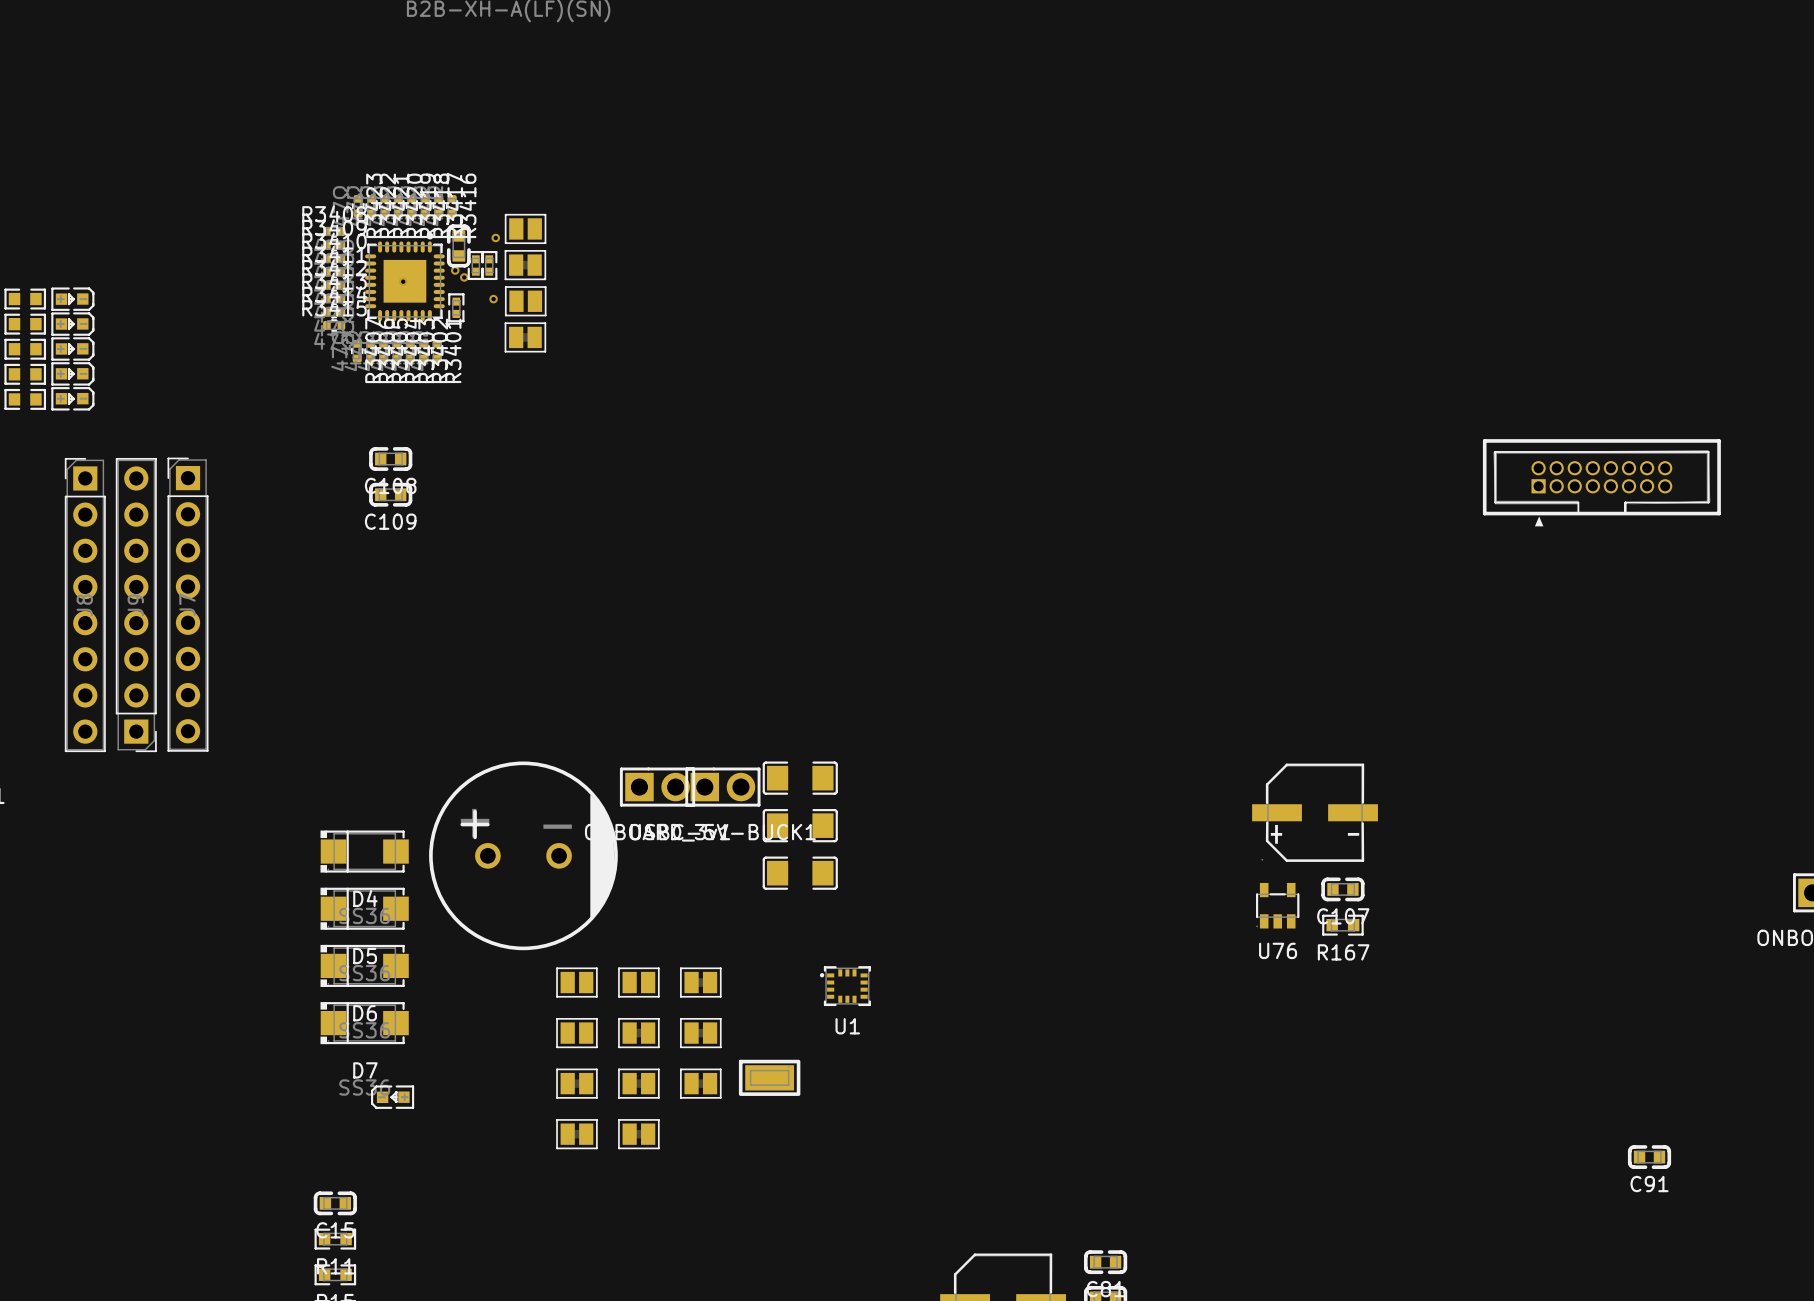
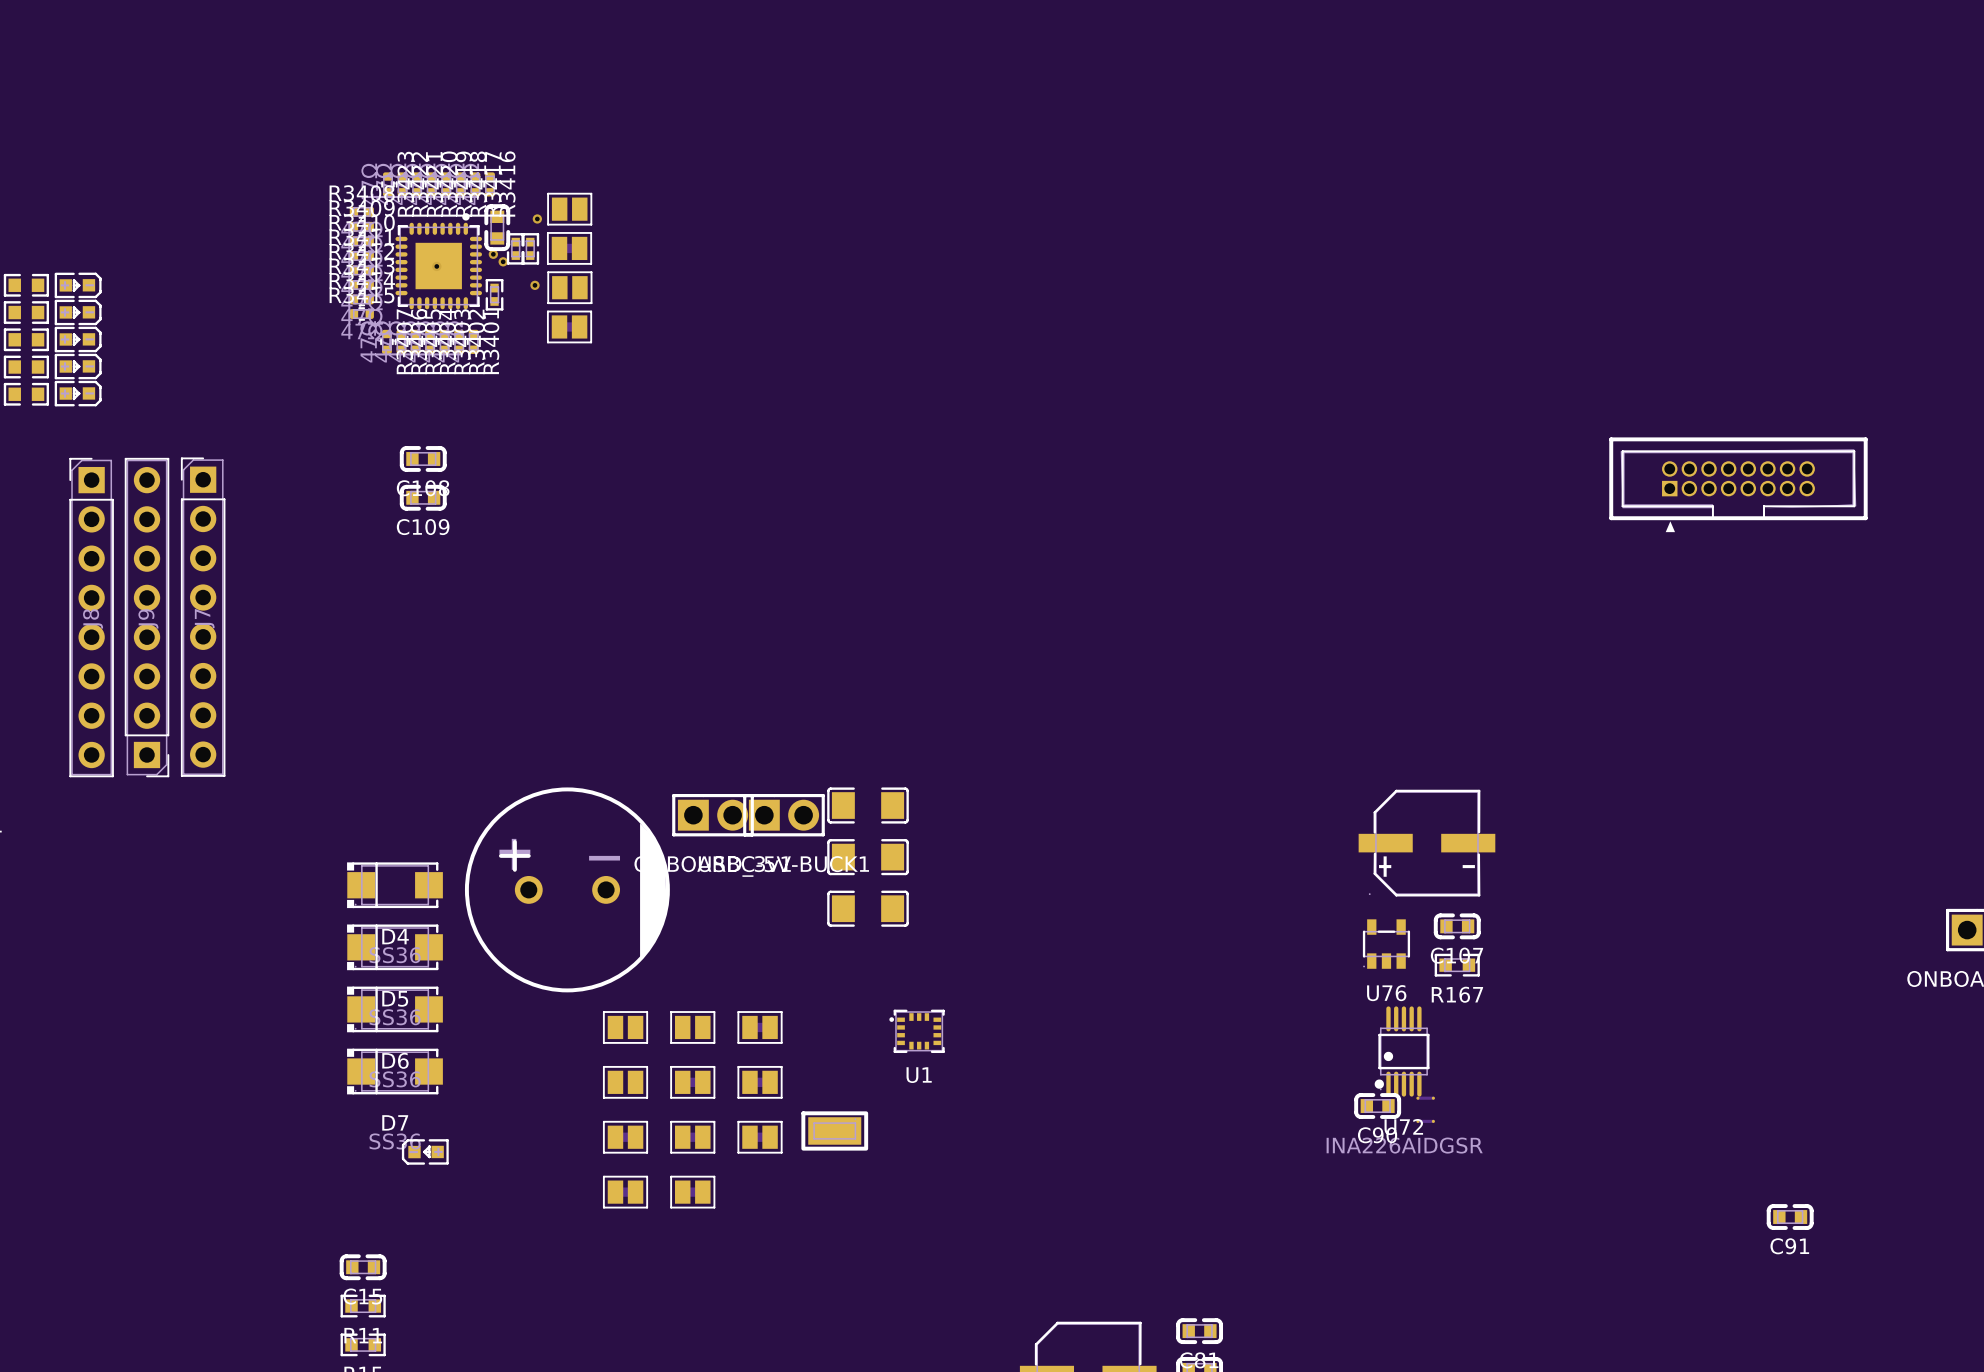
U72: none -> INA226AIDGSR (1402, 1051)
part: none -> (1425, 1098)
C90: none -> (1377, 1106)
part: none -> (1425, 1121)

